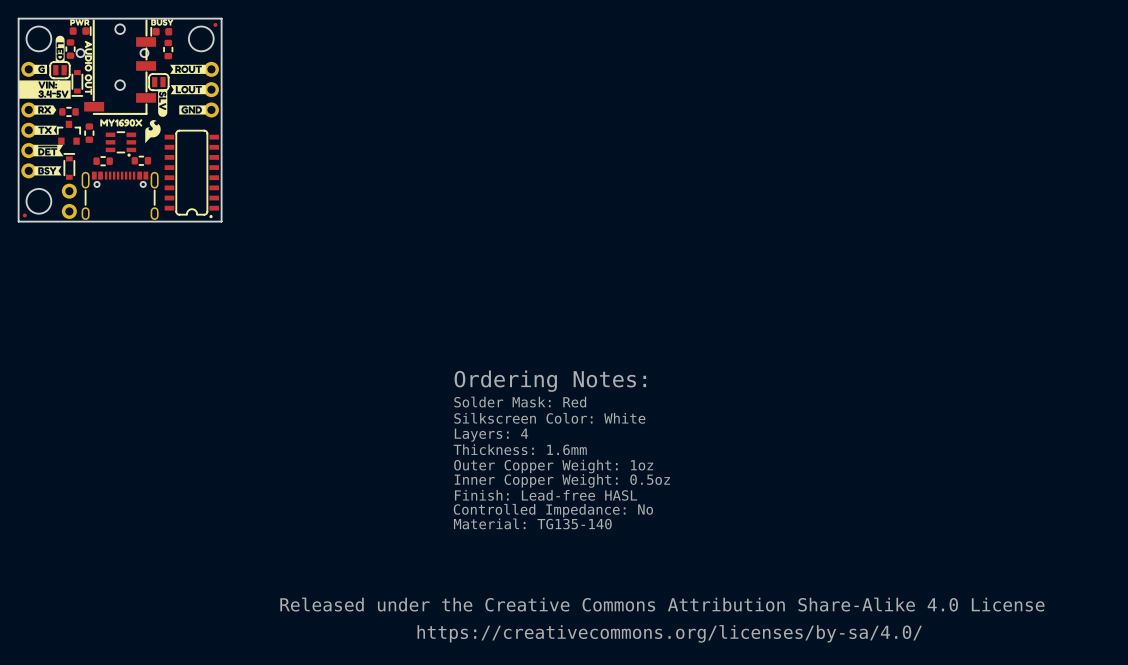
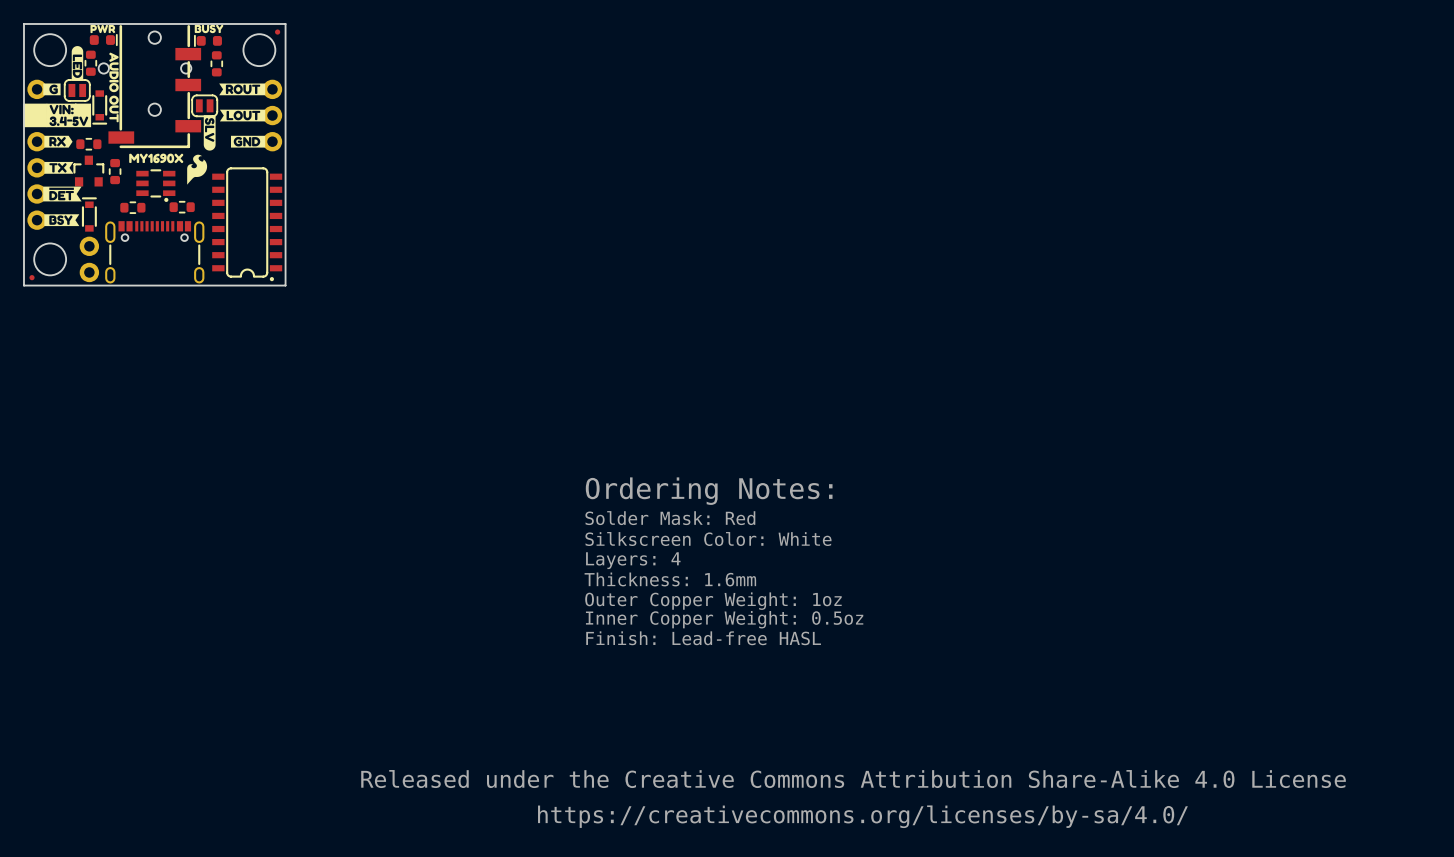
text: Controlled Impedance: No (553, 510) -> none
text: Material: TG135-140 (532, 523) -> none

